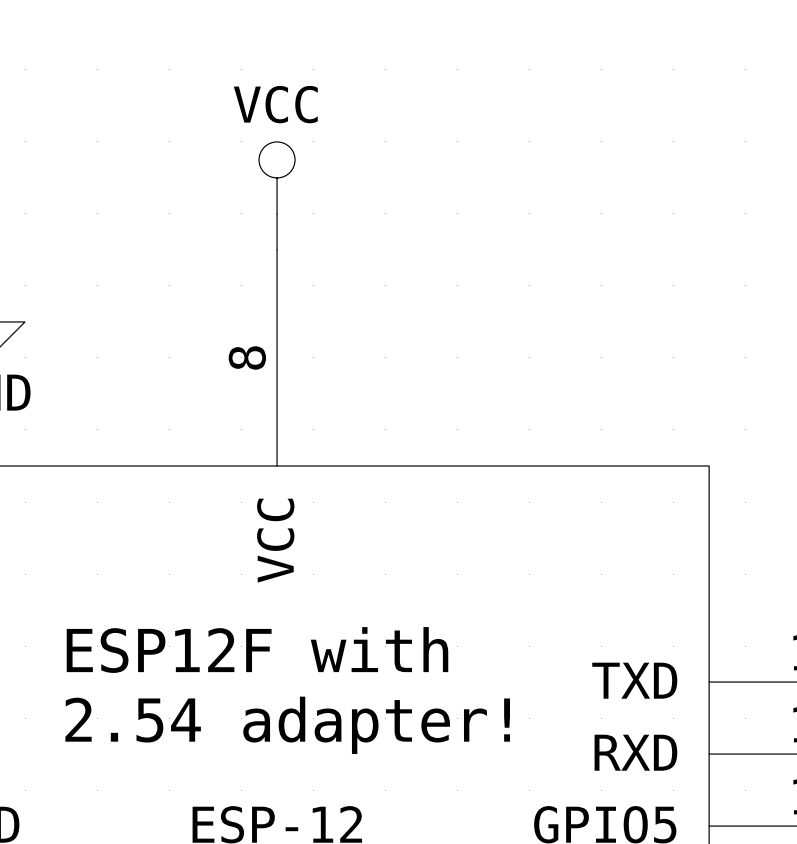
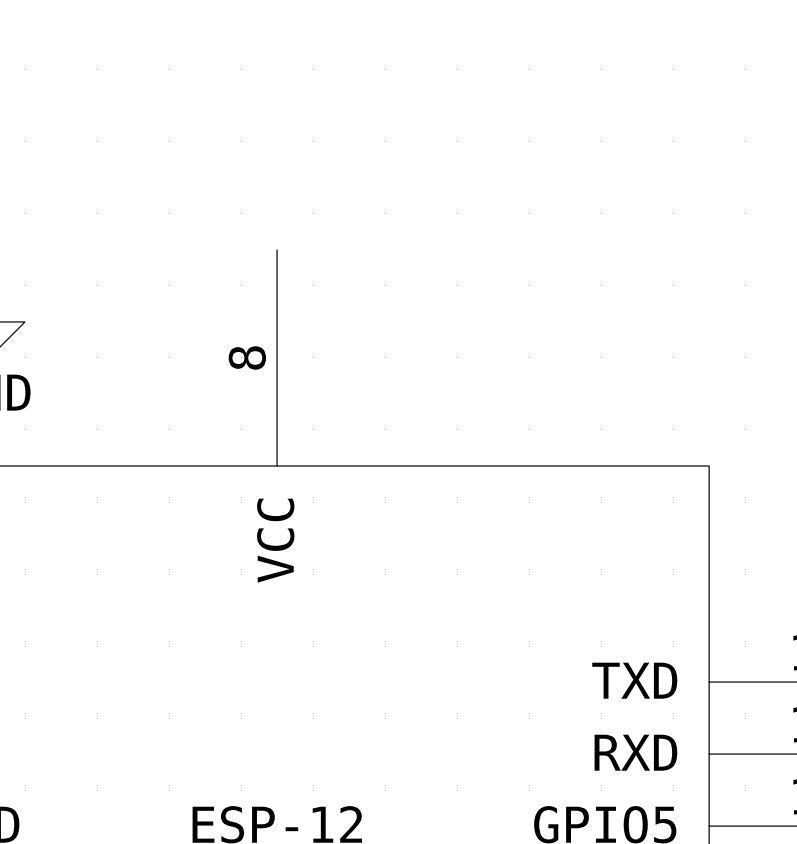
power symbol: VCC (277, 177) -> none
wire: (277, 213) (277, 249) -> none
text: ESP12F with (257, 650) -> none
text: 2.54 adapter! (287, 725) -> none

